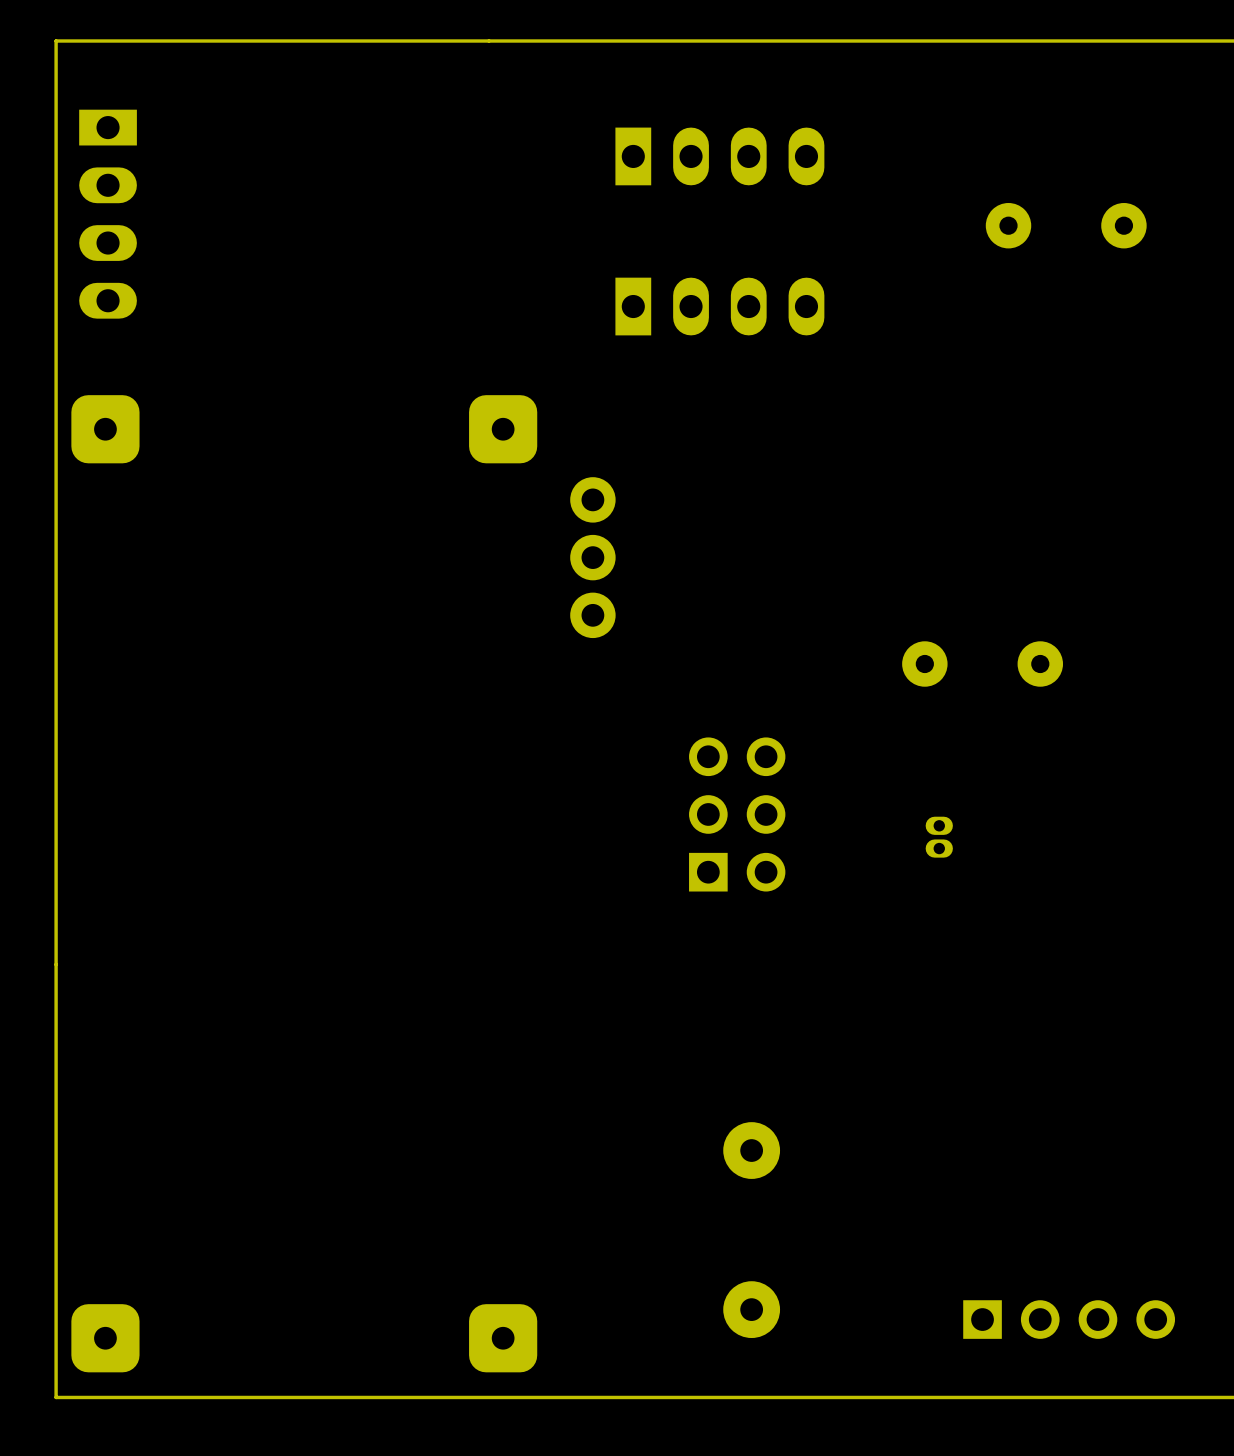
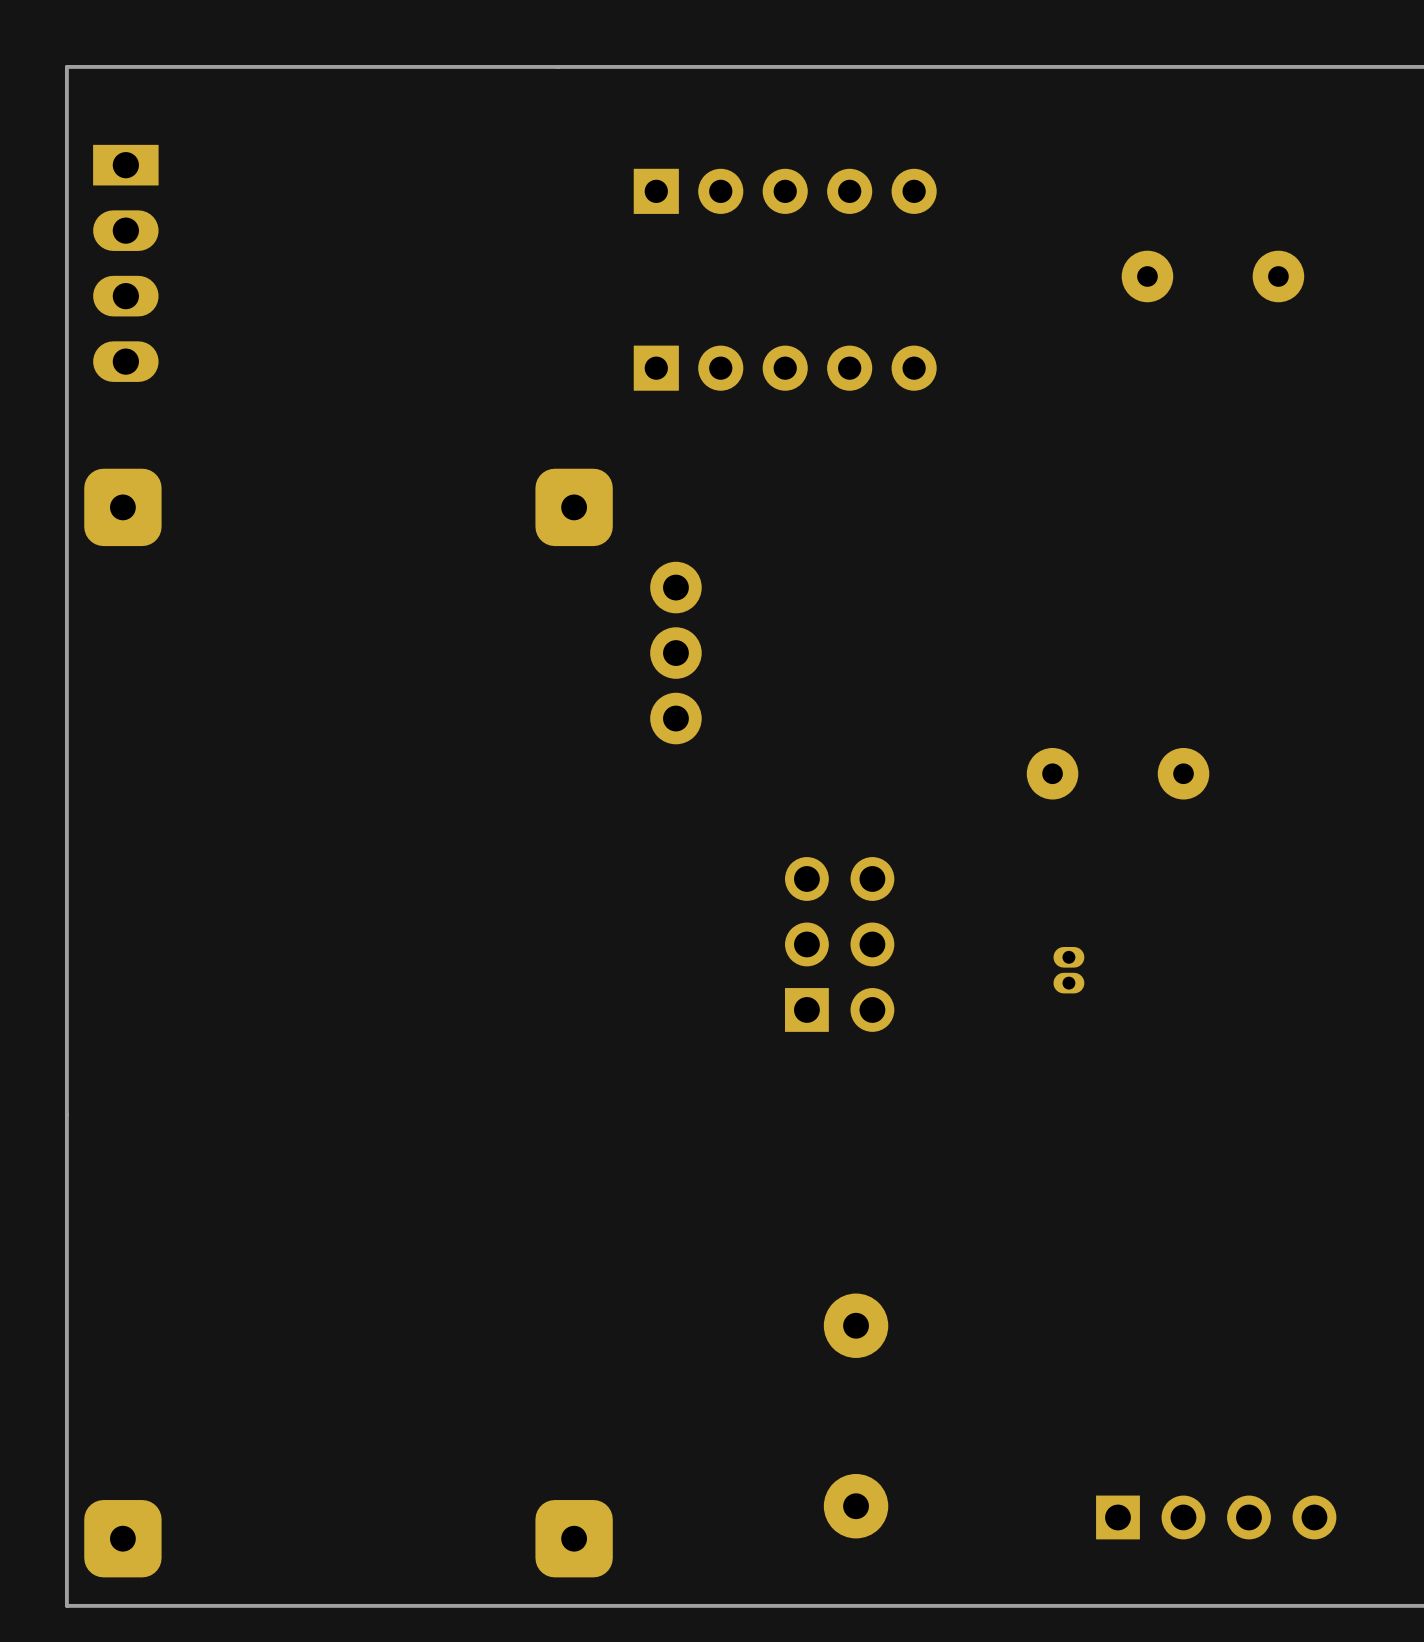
part: none -> (785, 191)
part: (719, 156) -> none
part: none -> (785, 368)
part: (719, 306) -> none

